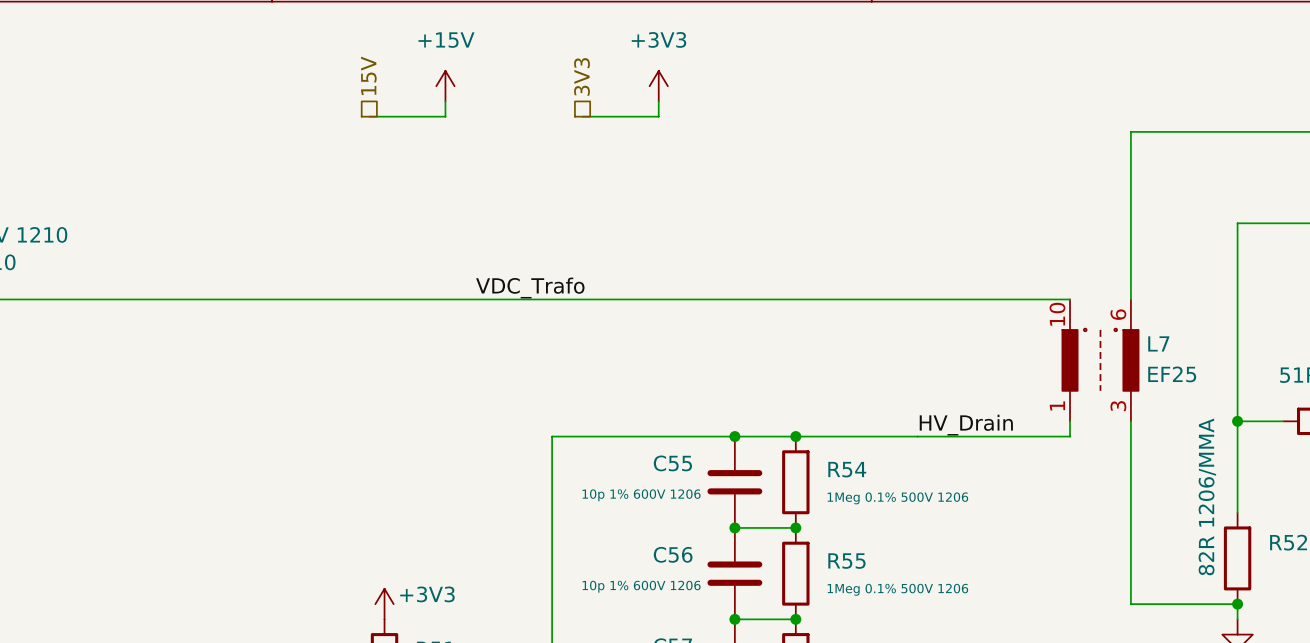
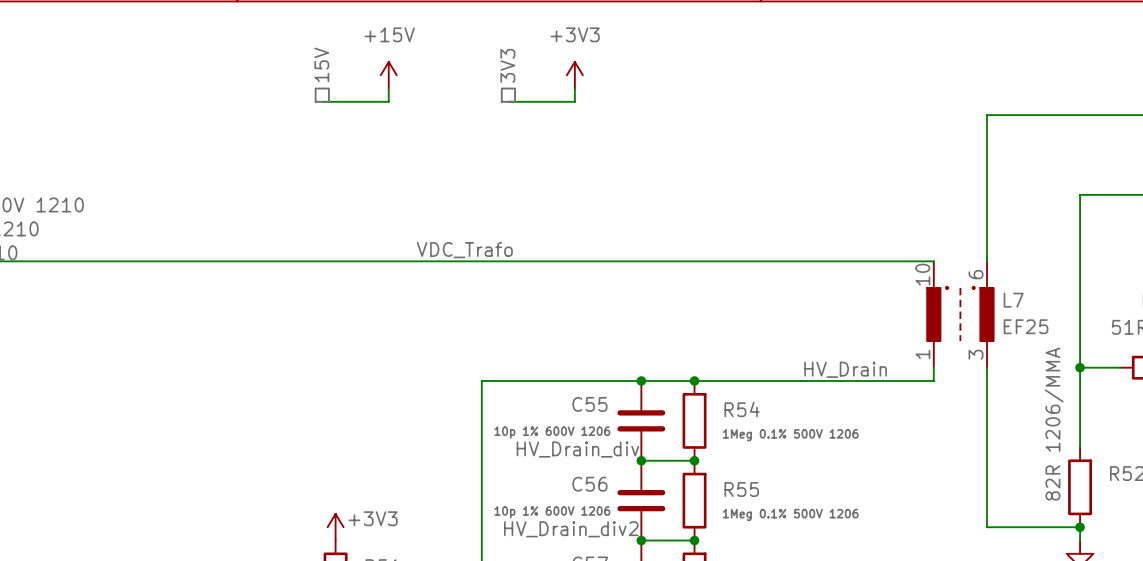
label: none -> HV_Drain_div (577, 449)
label: none -> HV_Drain_div2 (571, 529)

